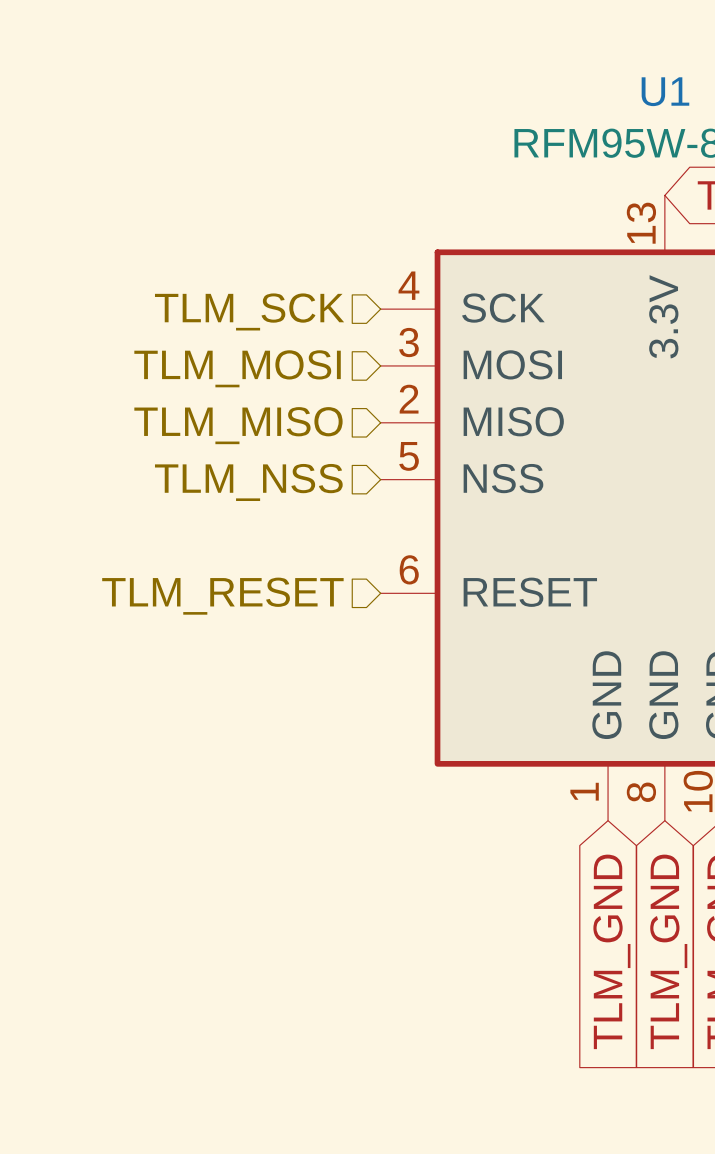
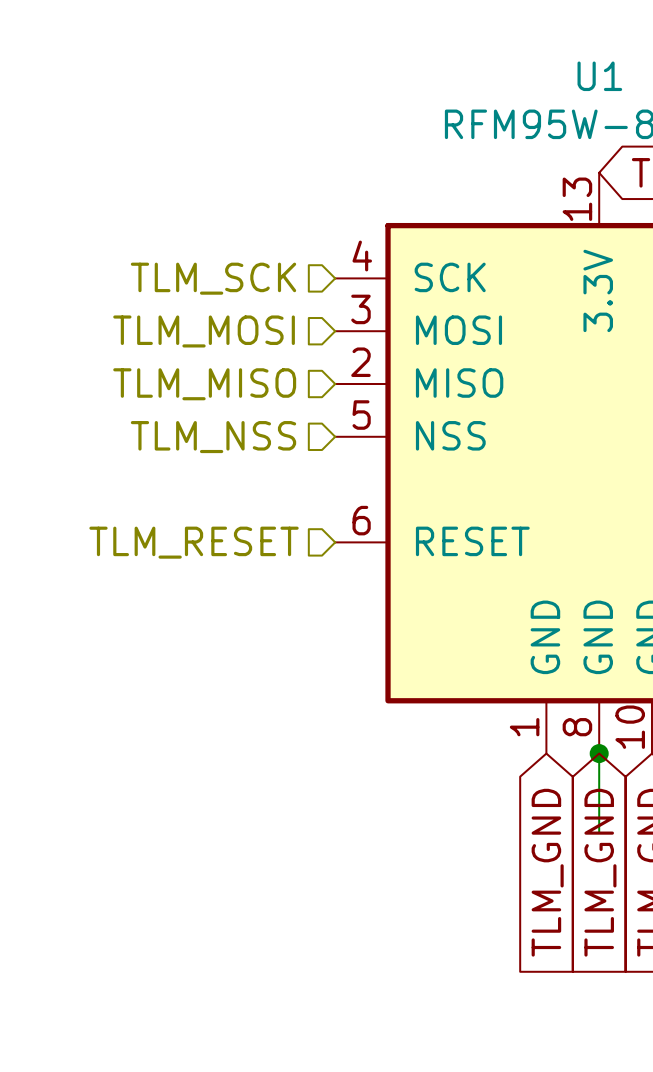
wire: none -> (599, 753) (599, 832)
junction: none -> (599, 753)

